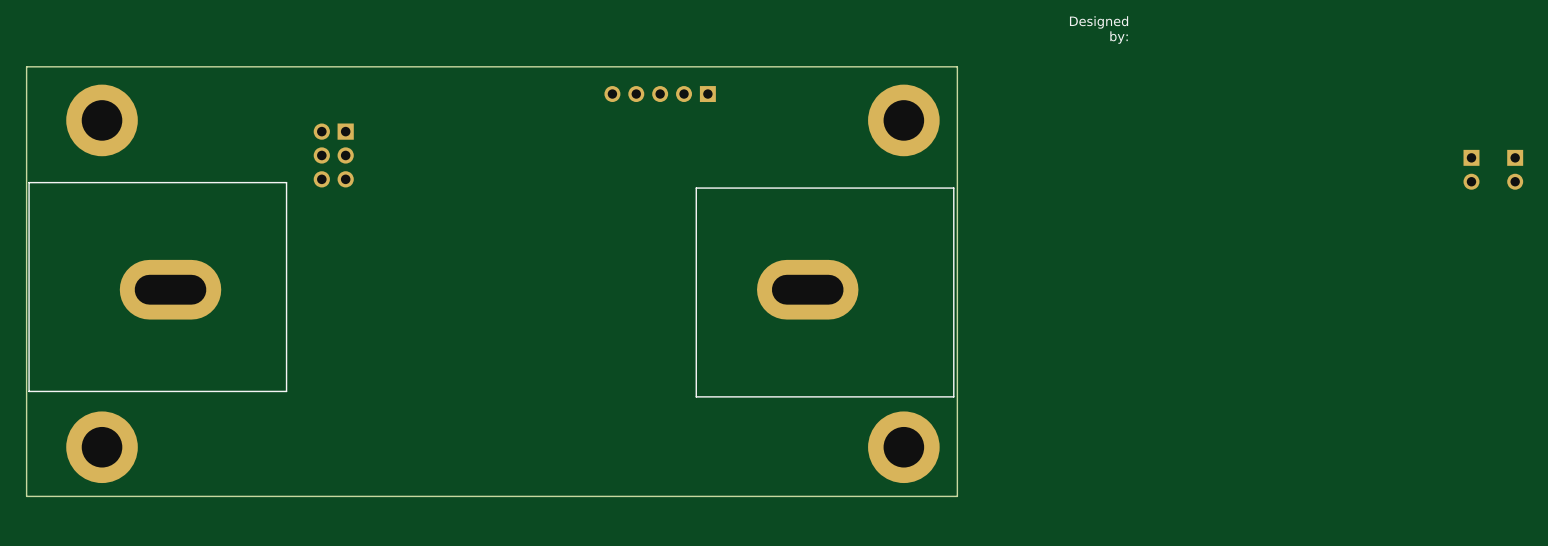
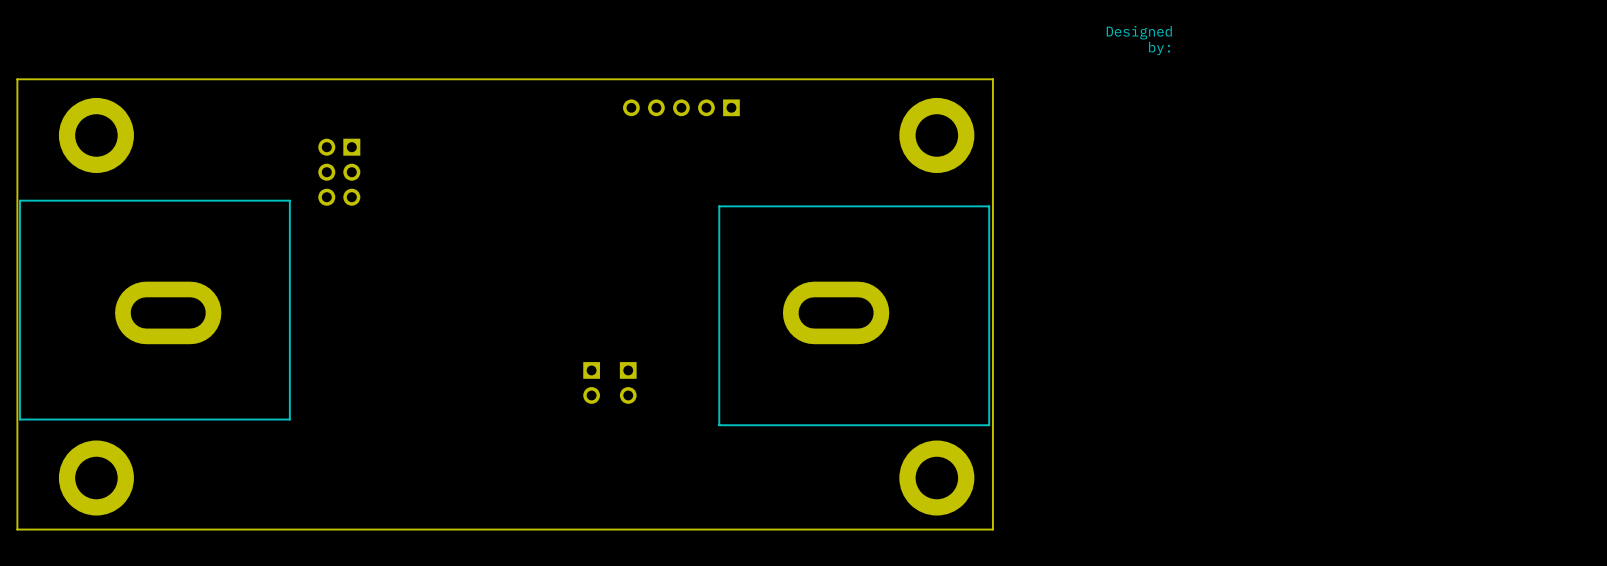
part: (1471, 169) -> none
part: (1515, 169) -> none
part: none -> (591, 382)
part: none -> (628, 382)

